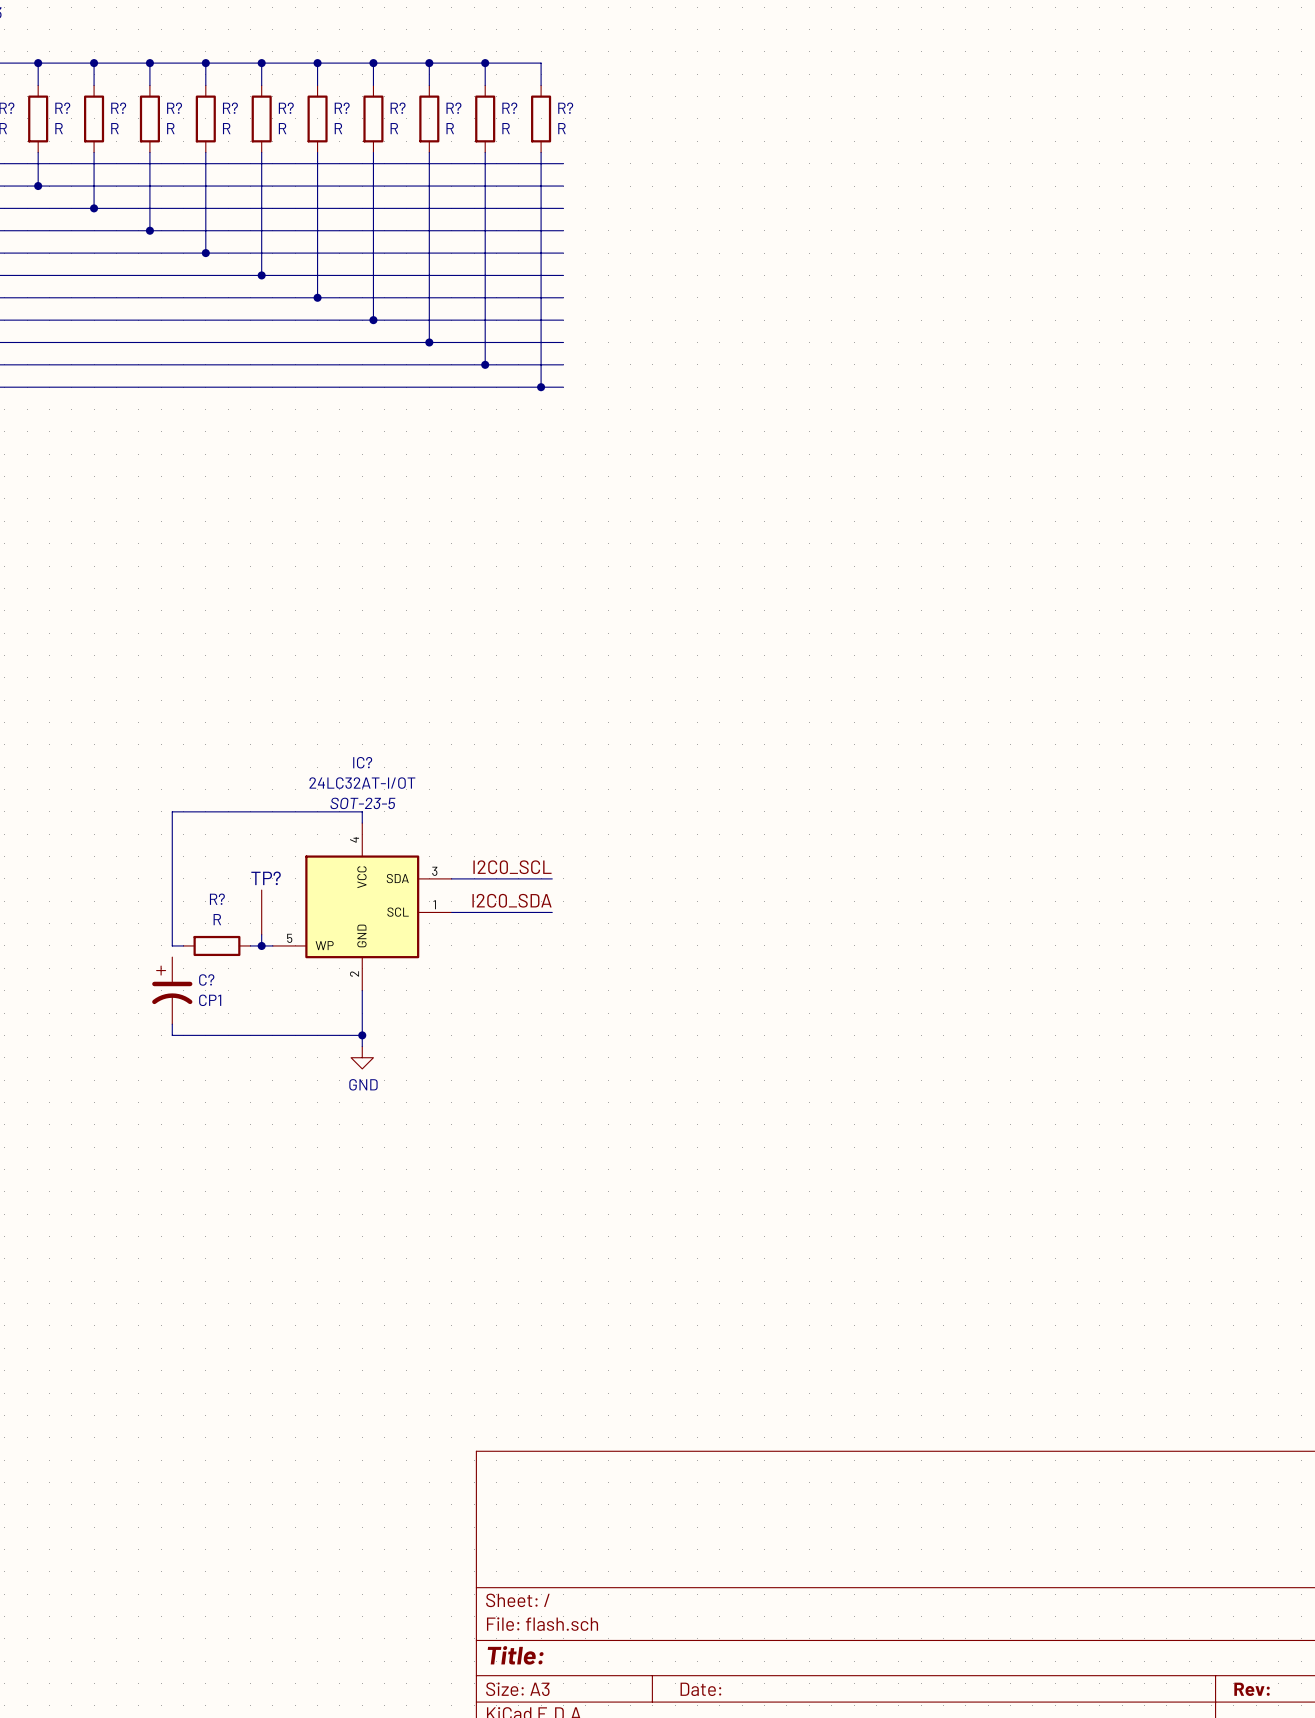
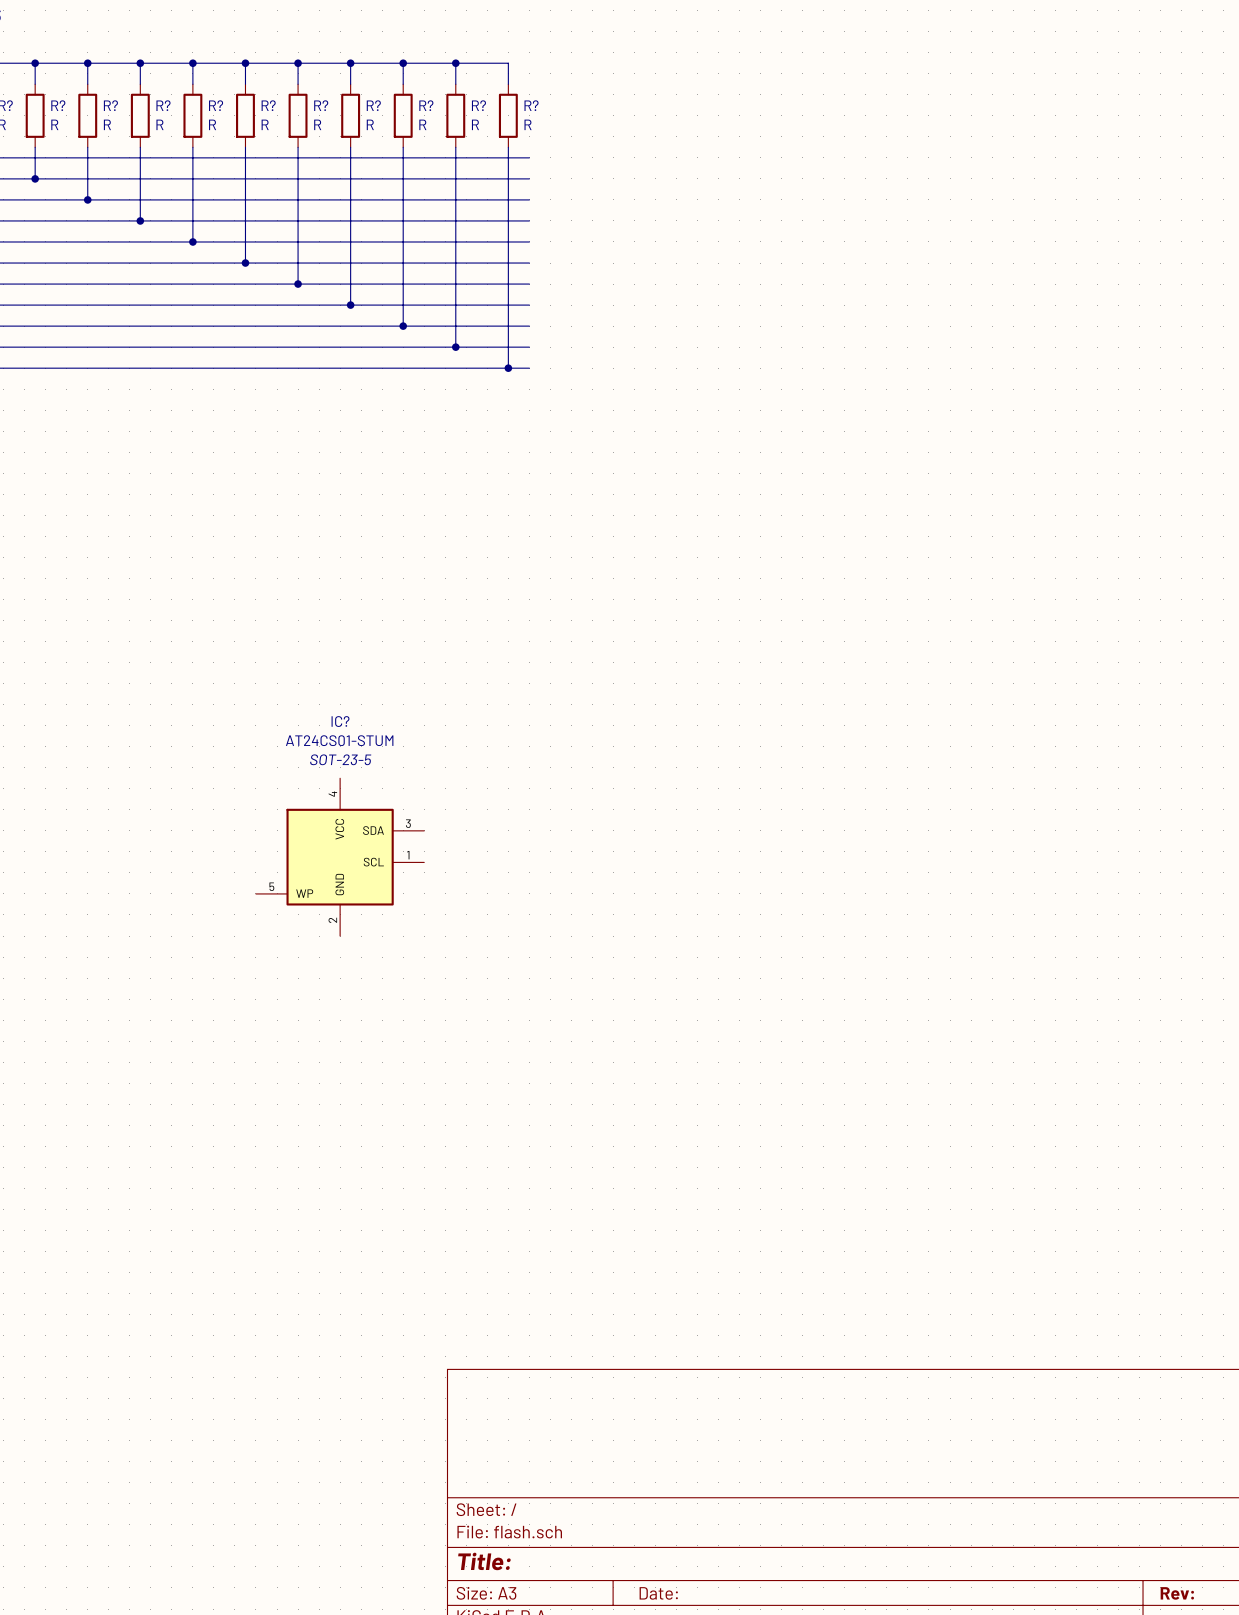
IC? value: 24LC32AT-I/OT (362, 783) -> AT24CS01-STUM (339, 740)
wire: (362, 823) (362, 811) (172, 811) (172, 945) (183, 945) -> none
label: I2C0_SCL (512, 867) -> none
wire: (451, 878) (552, 878) -> none
label: I2C0_SDA (512, 900) -> none
TP?: (261, 912) -> none
wire: (451, 912) (552, 912) -> none
wire: (261, 934) (261, 945) -> none
R?: R (216, 945) -> none
wire: (250, 945) (272, 945) -> none
junction: (261, 945) -> none
C?: CP1 (172, 990) -> none
wire: (362, 990) (362, 1046) -> none
wire: (172, 1024) (172, 1035) (362, 1035) -> none
junction: (362, 1035) -> none
power symbol: GND (362, 1057) -> none

